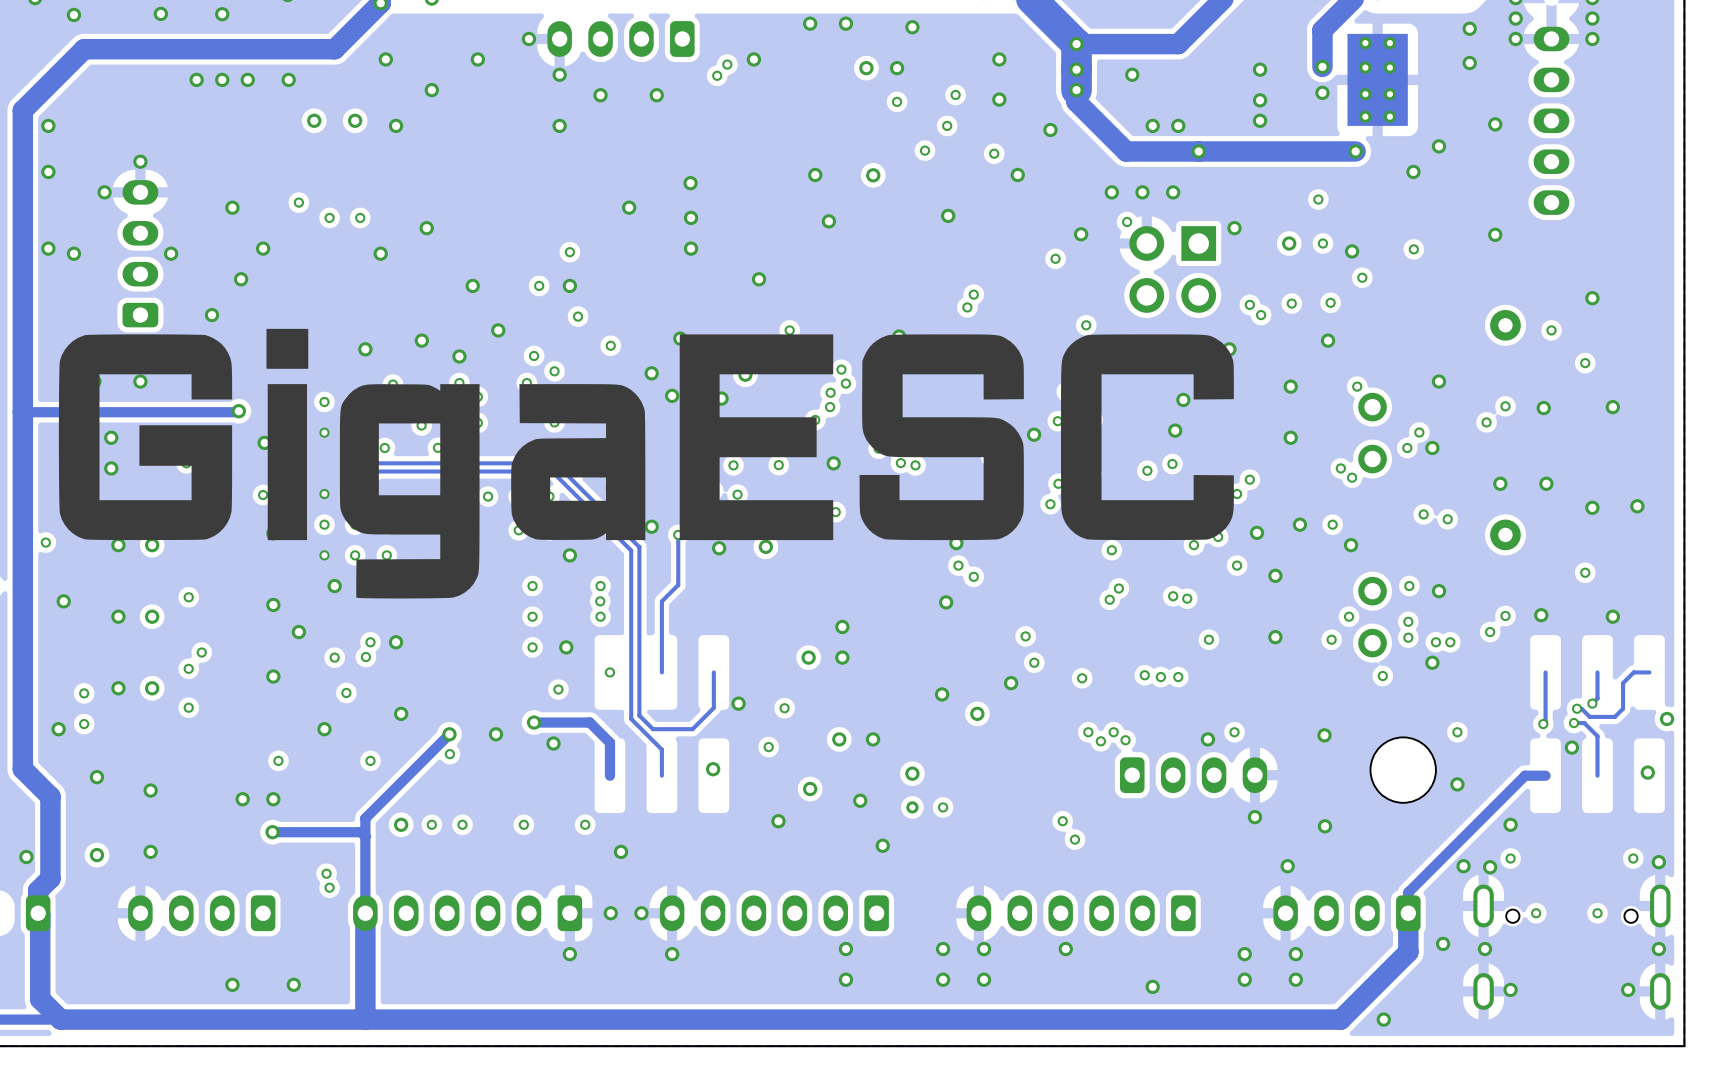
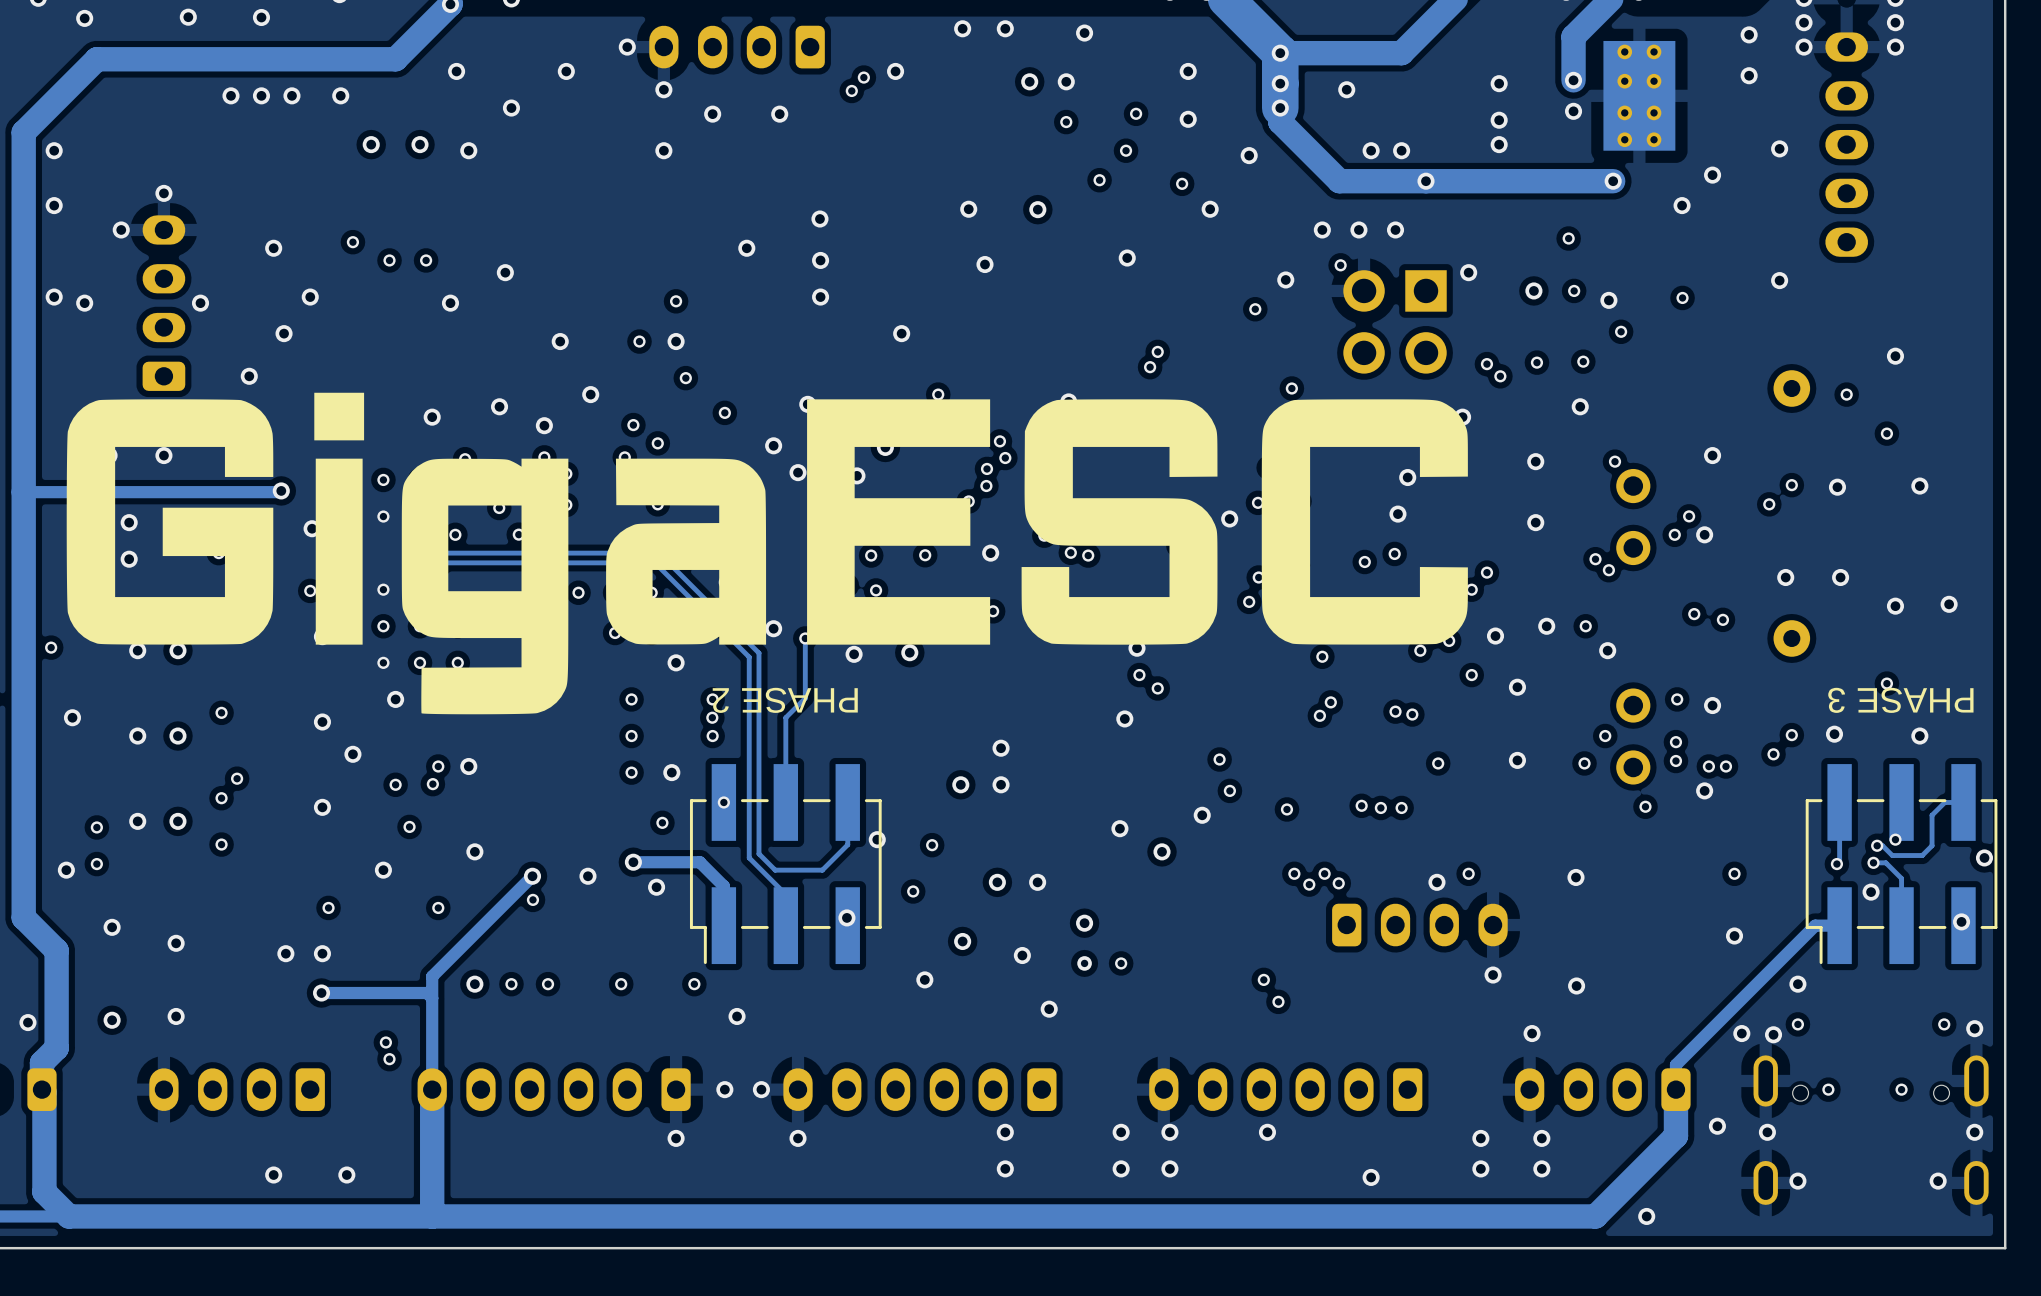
part: none -> (785, 864)
part: none -> (1901, 864)
part: (1403, 770) -> none

